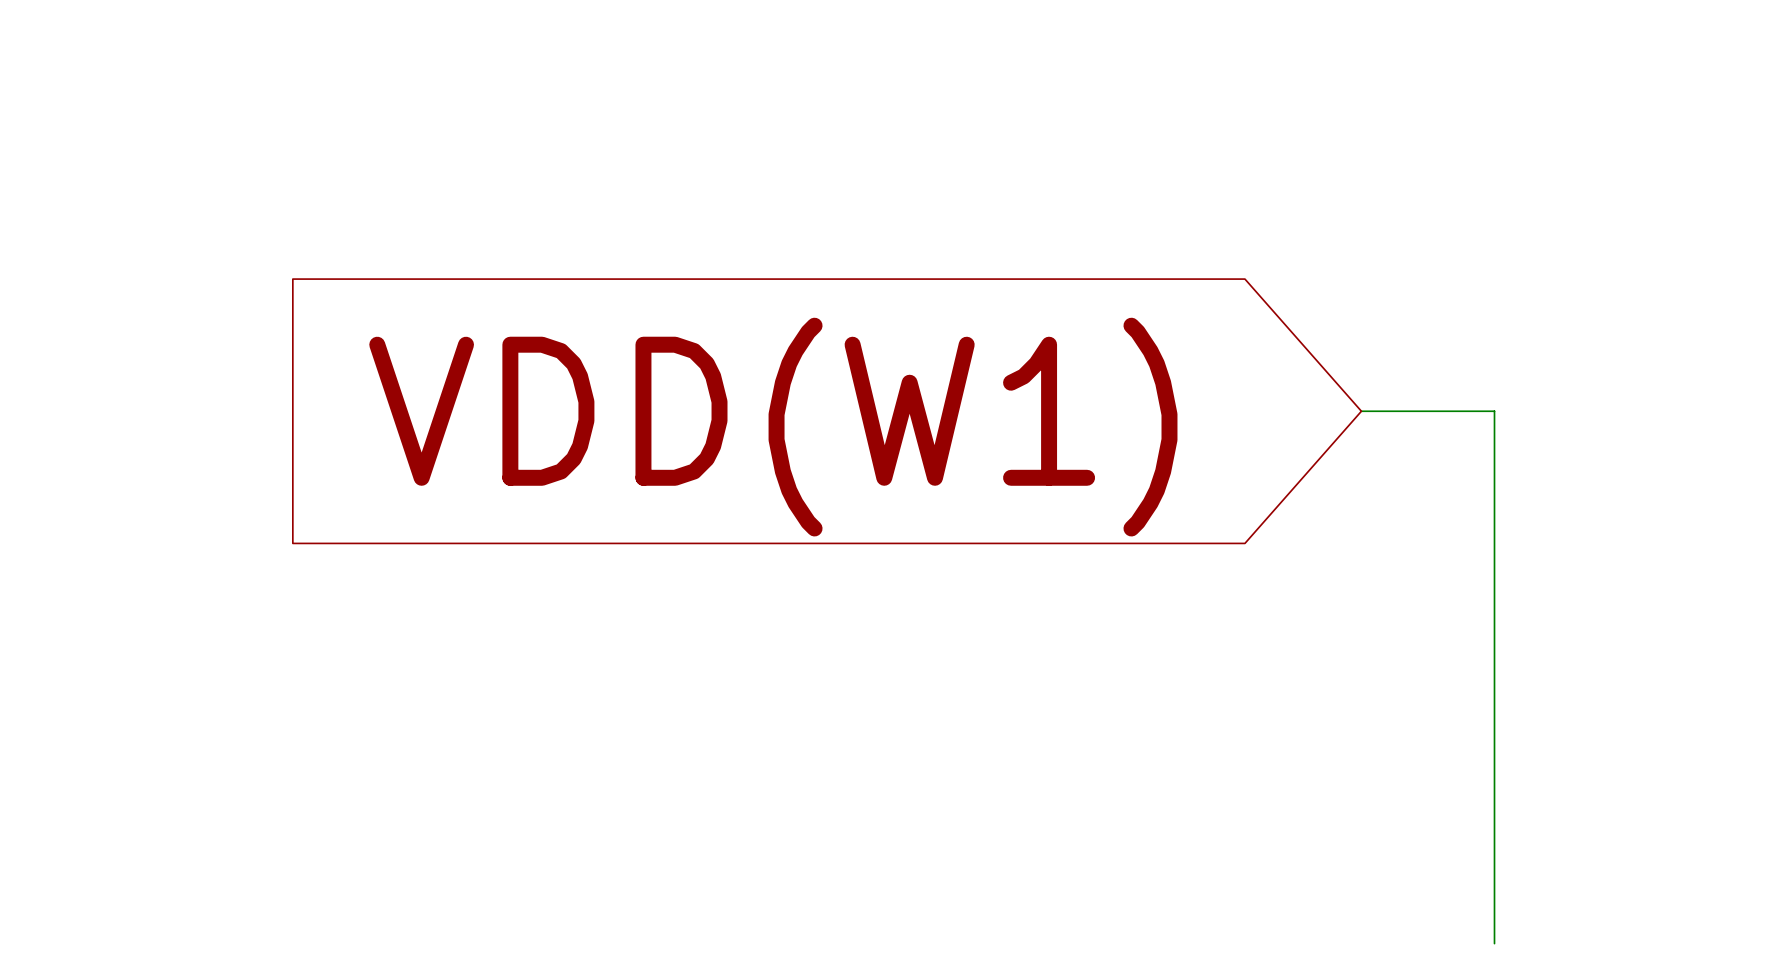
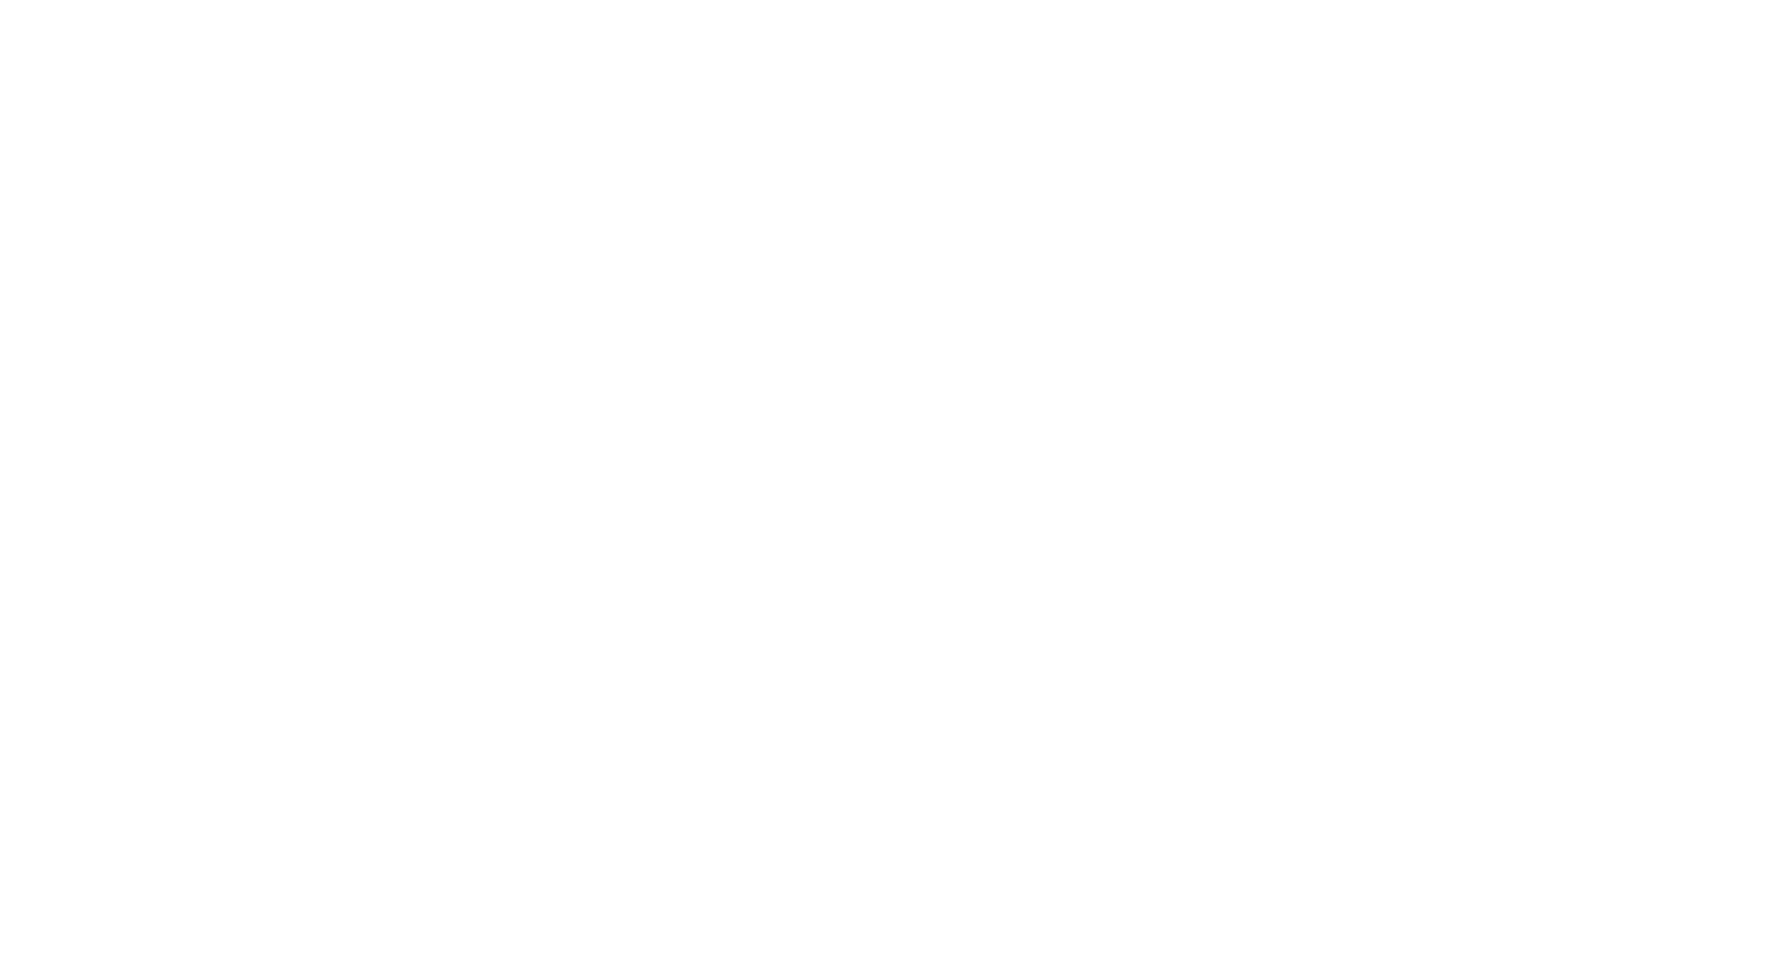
wire: (1361, 411) (1494, 411) (1494, 943) -> none
global label: VDD(W1) (773, 427) -> none

